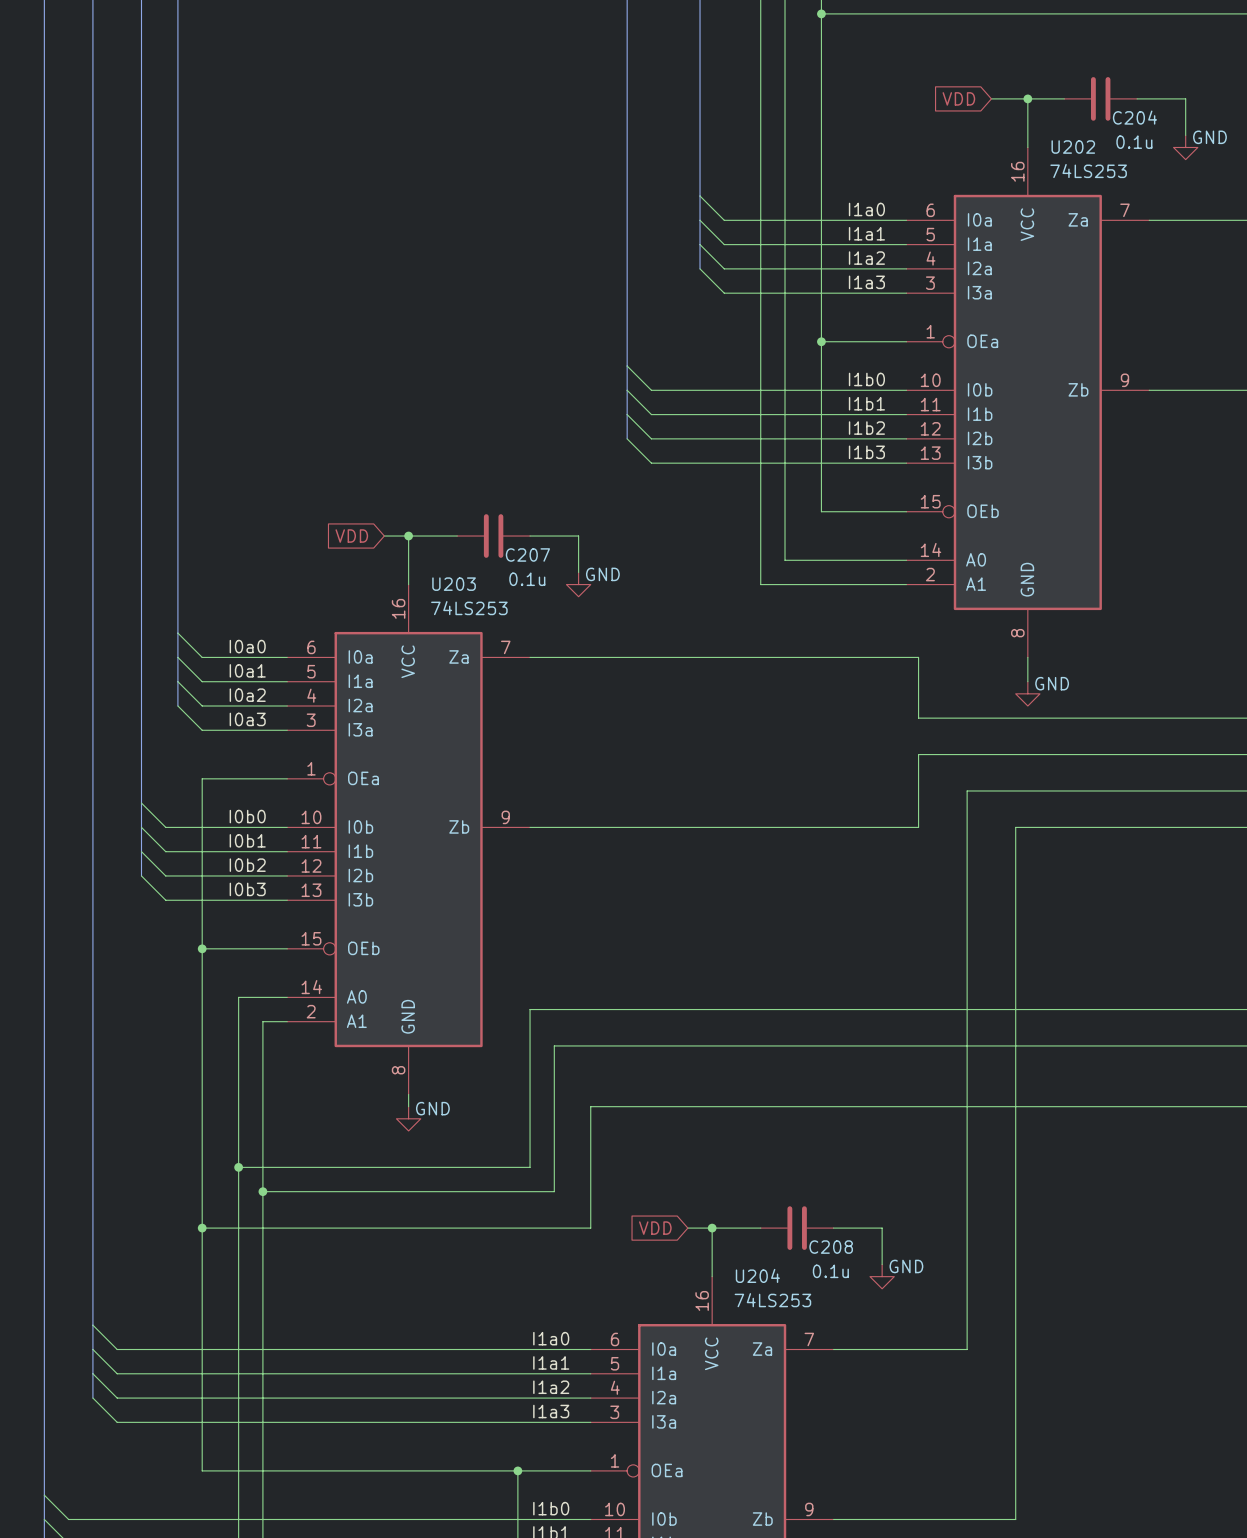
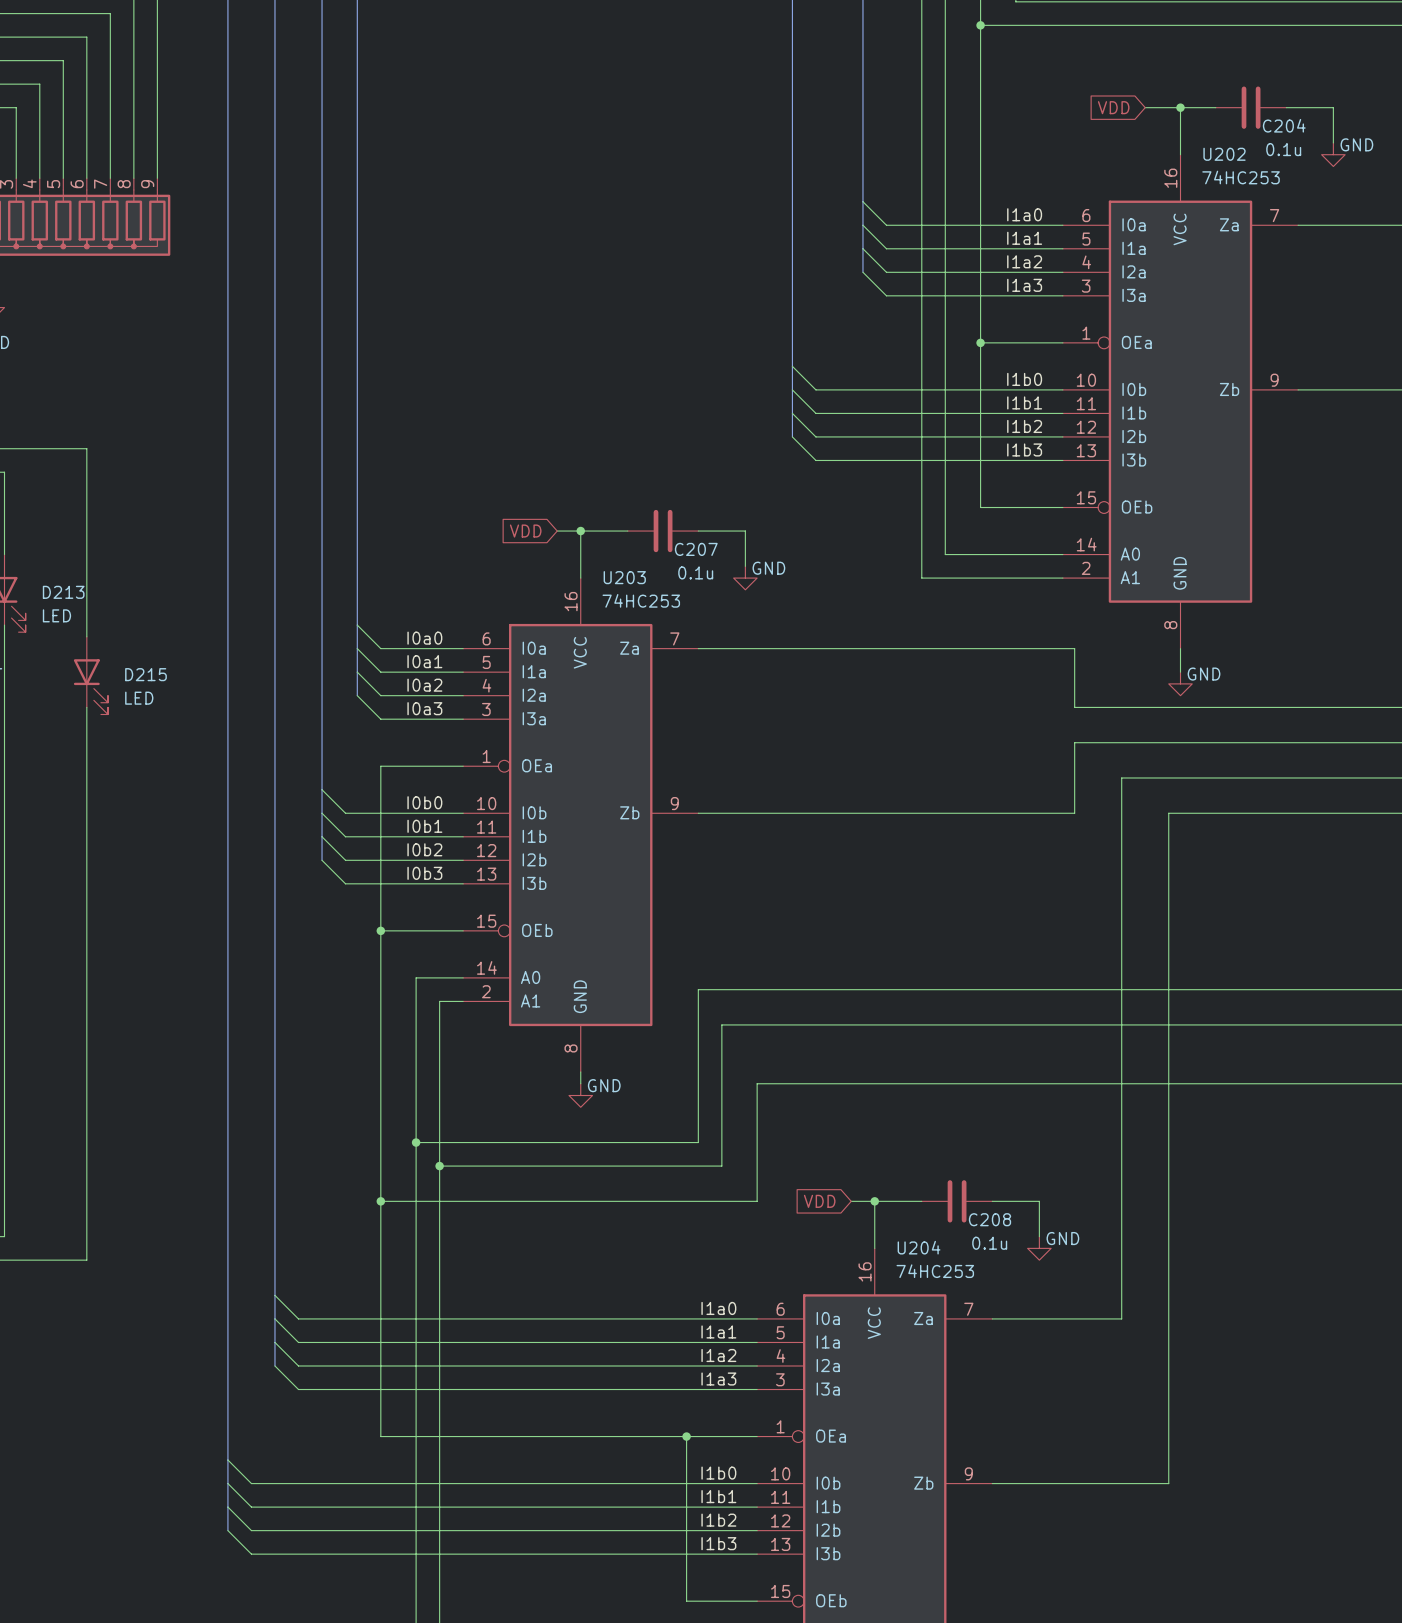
U202 value: 74LS253 (1088, 171) -> 74HC253 (1241, 177)
U203 value: 74LS253 (469, 608) -> 74HC253 (641, 600)
U204 value: 74LS253 (772, 1300) -> 74HC253 (935, 1271)

